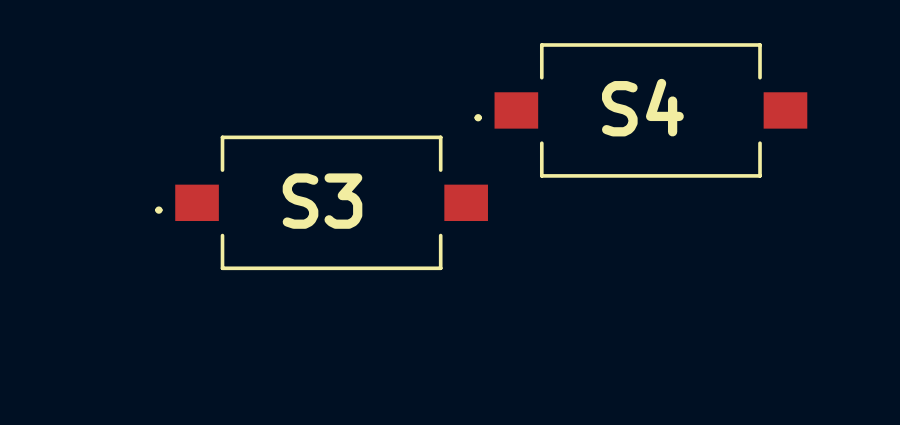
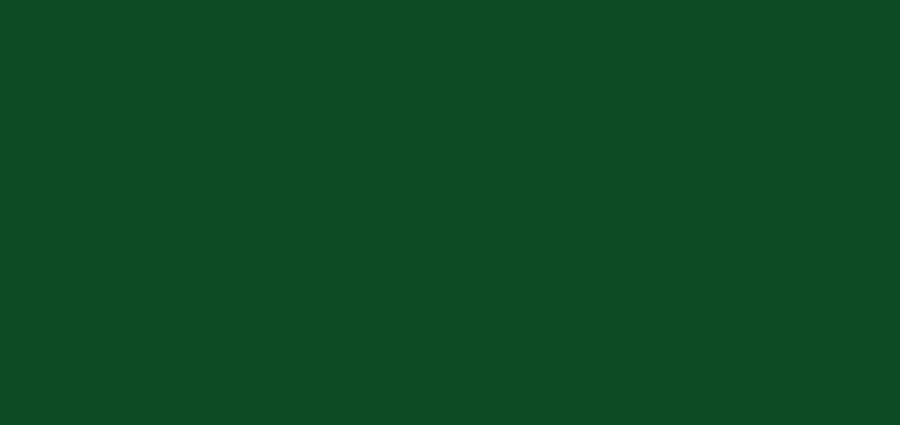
S4: (640, 110) -> none
S3: (321, 202) -> none

